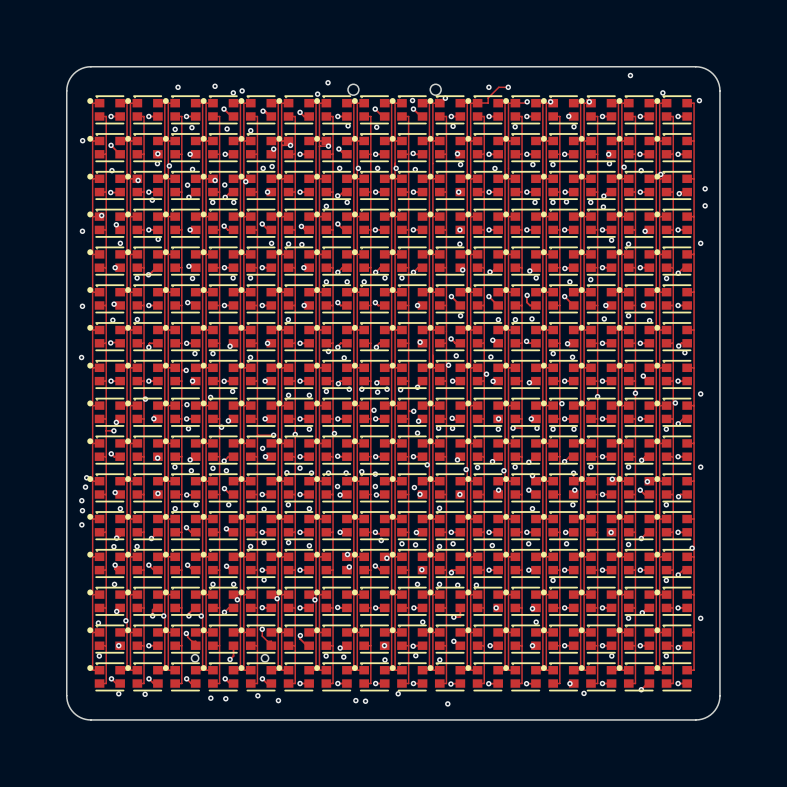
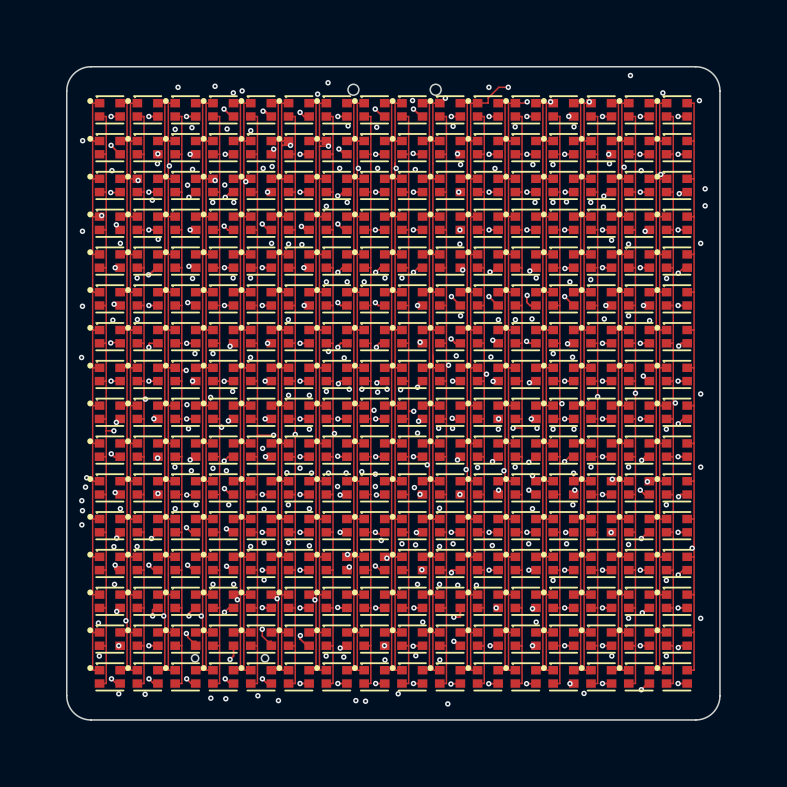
via: (684, 352) -> none

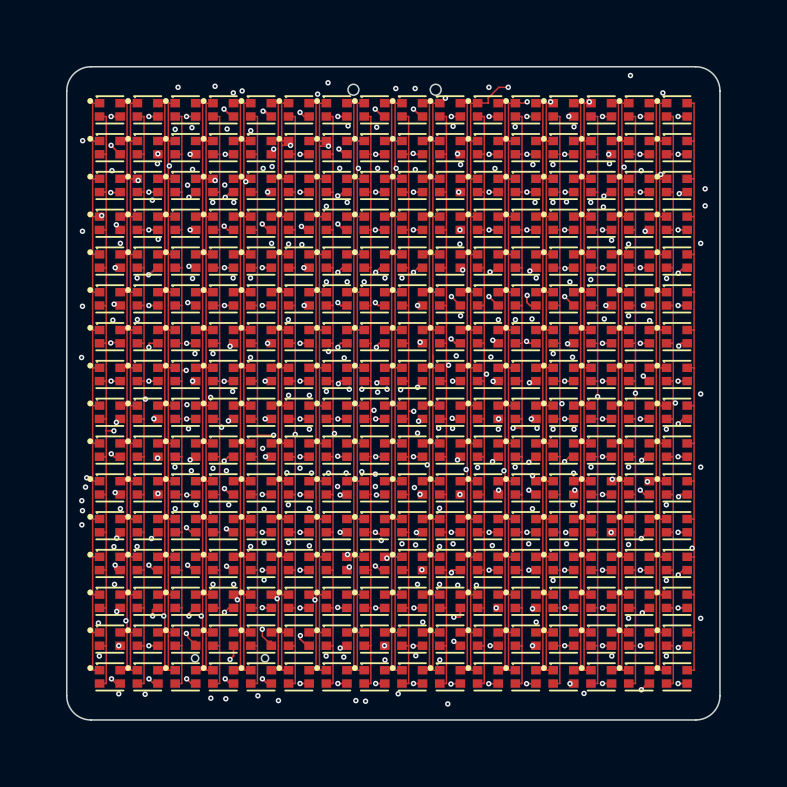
via: none -> (395, 88)
via: none -> (415, 88)
via: (412, 100) -> none
via: (699, 100) -> none

